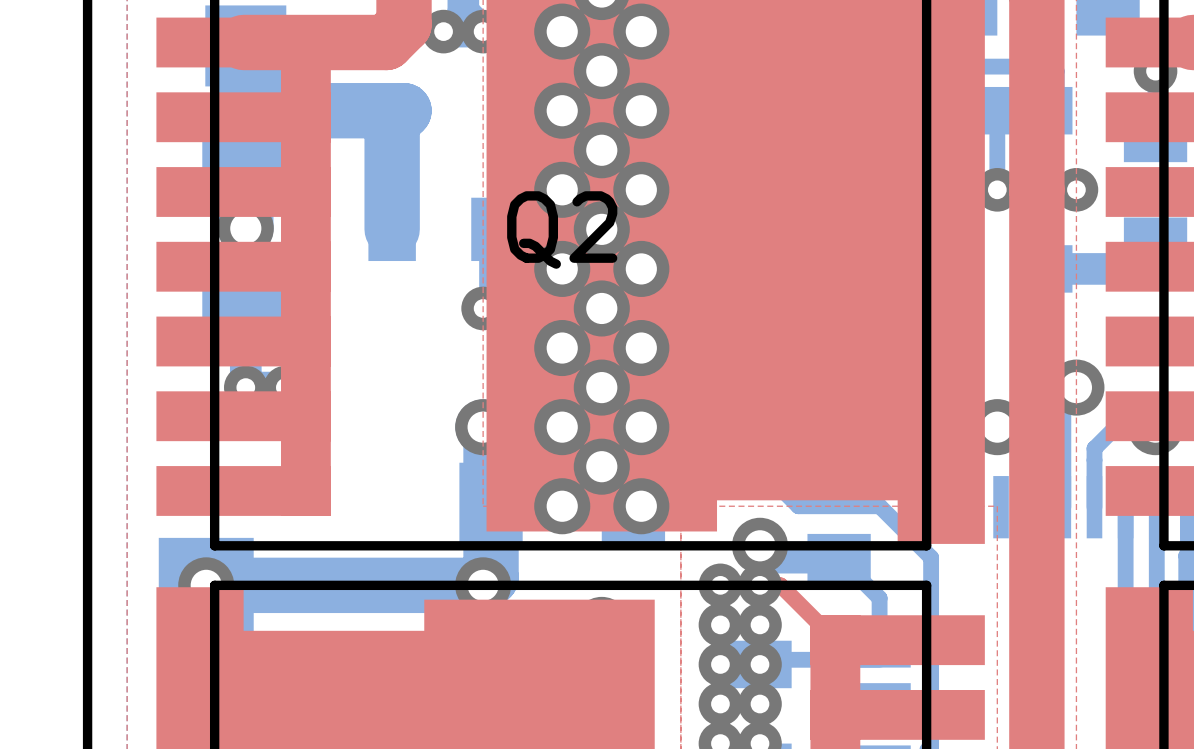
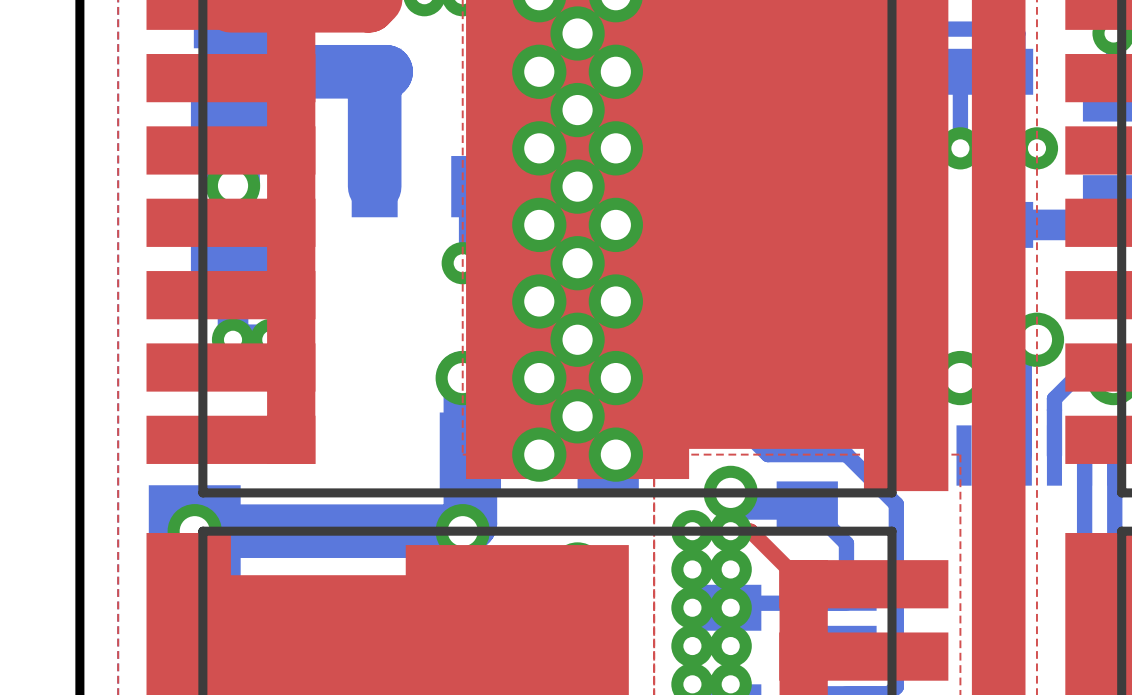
Q2 name: Q2 (562, 230) -> none

